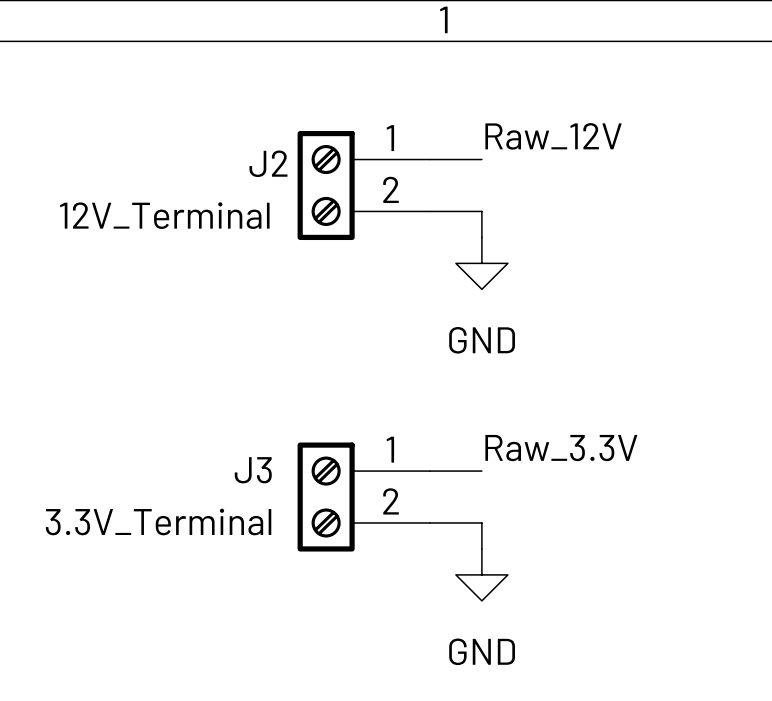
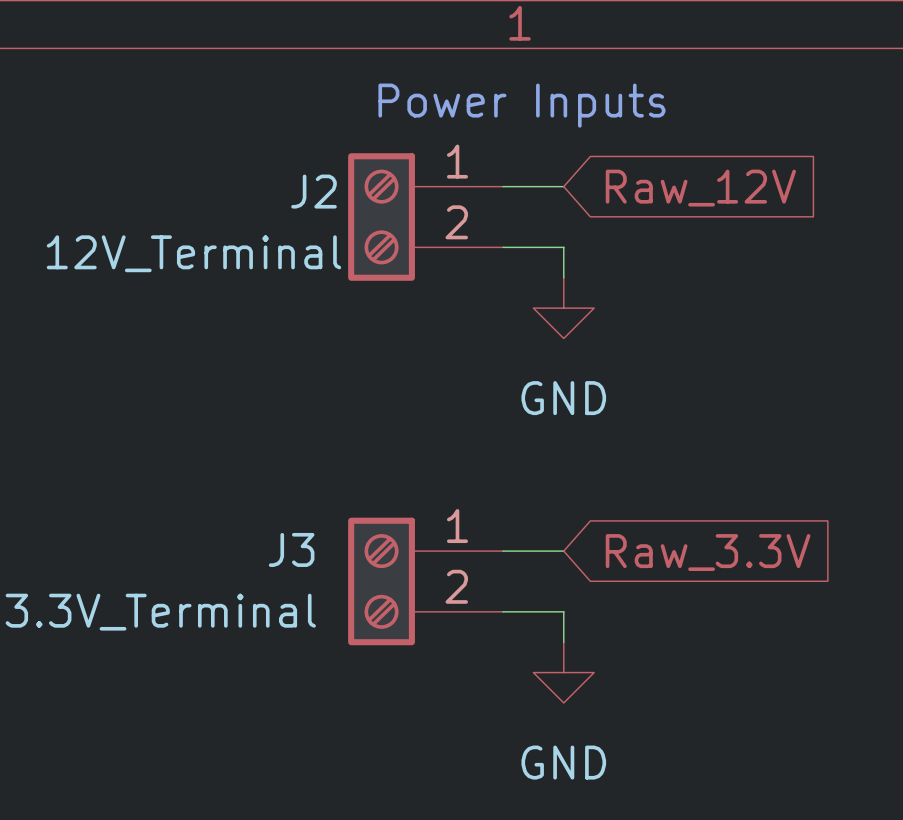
text: none -> Power Inputs (521, 105)
label: Raw_12V (553, 136) -> none
global label: none -> Raw_12V (700, 188)
label: Raw_3.3V (561, 448) -> none
global label: none -> Raw_3.3V (708, 552)

